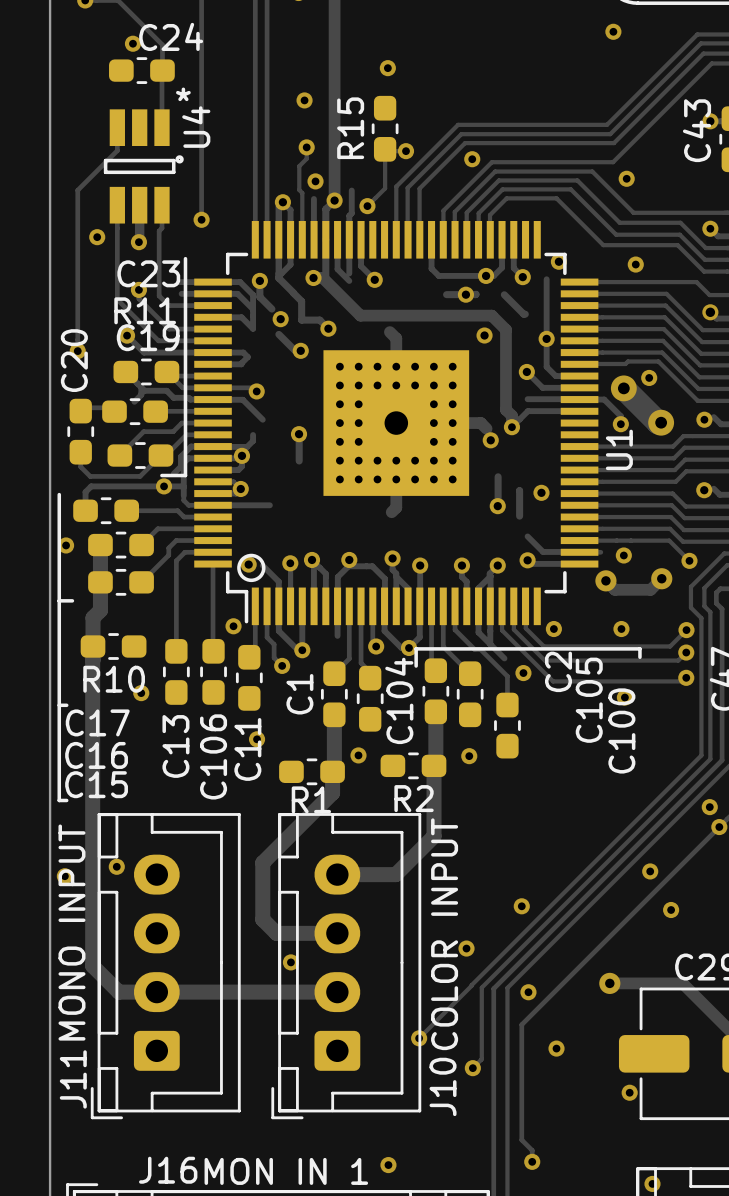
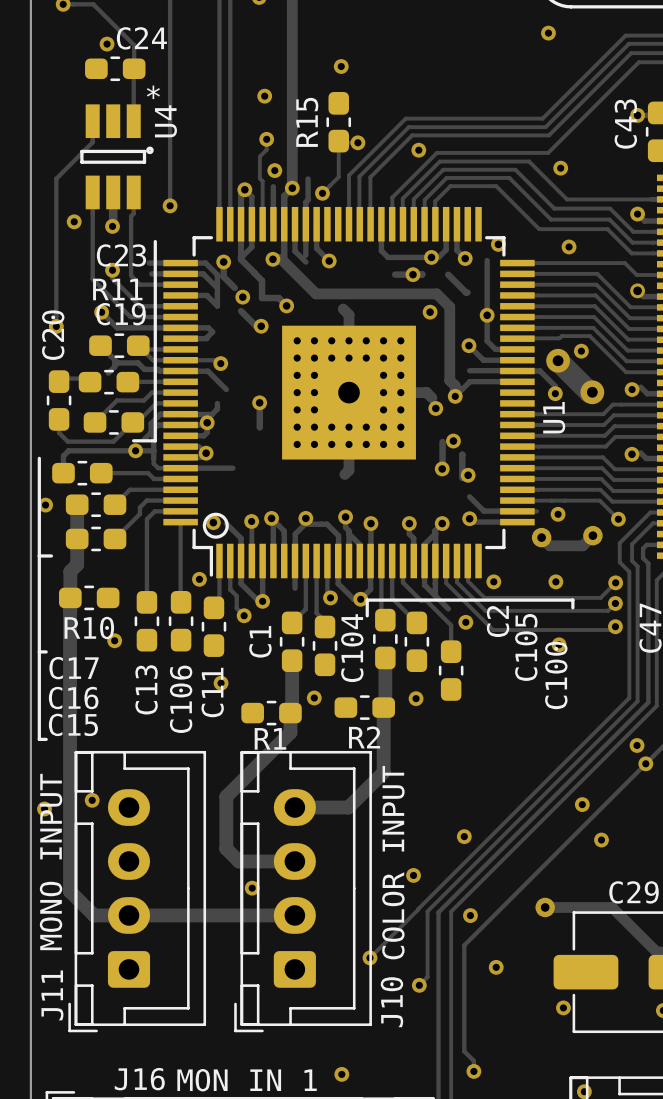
via: none -> (453, 441)
via: (541, 492) -> none
via: none -> (468, 475)

